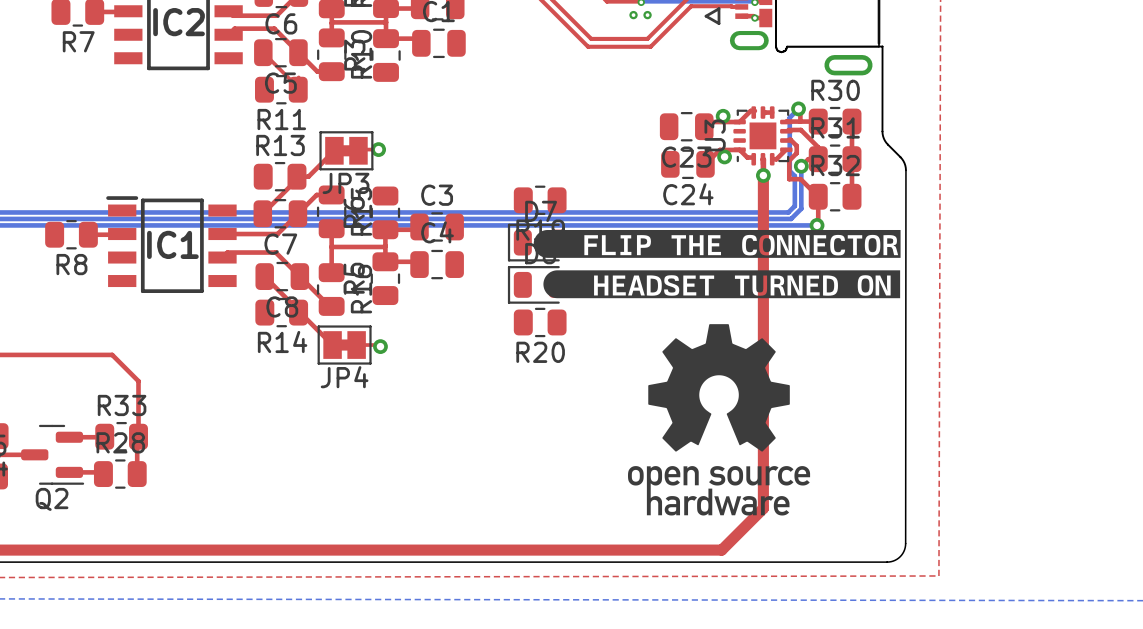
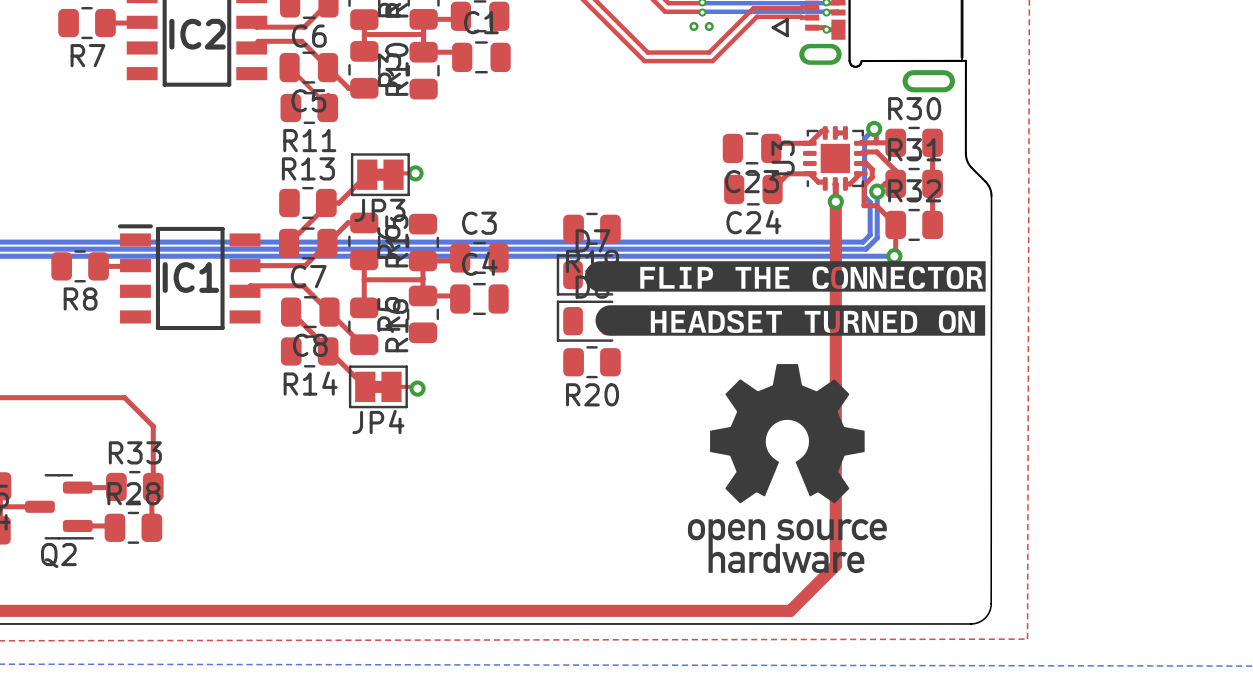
via: (723, 116) -> none
via: (724, 156) -> none

